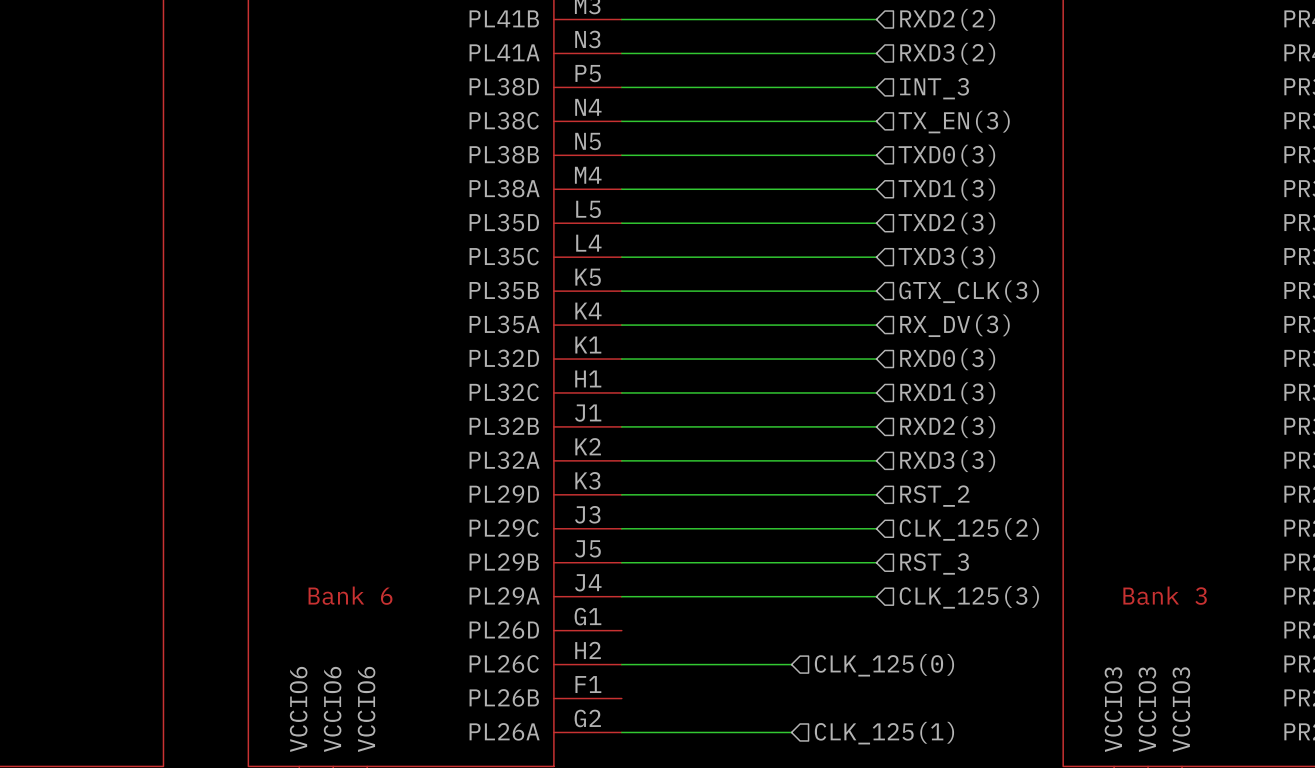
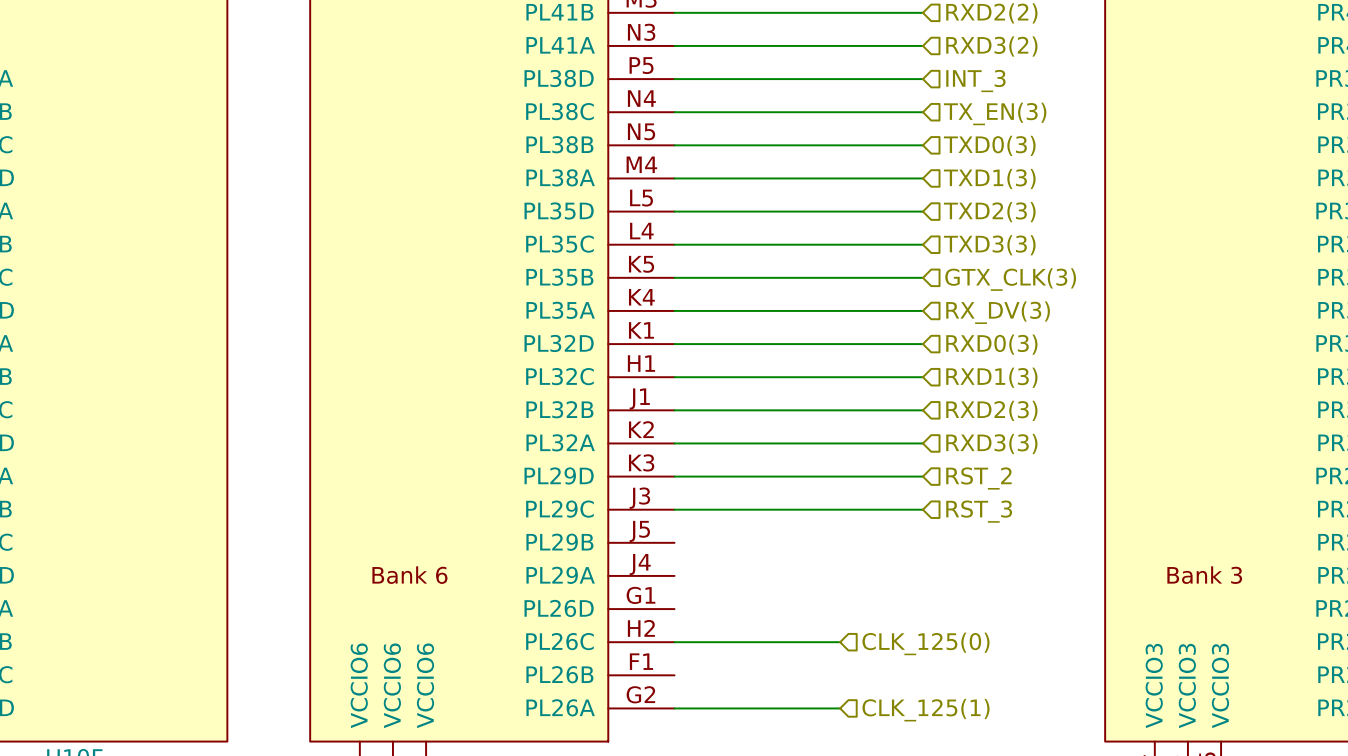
hierarchical label: CLK_125(2) (969, 529) -> RST_3 (979, 511)
wire: (621, 562) (876, 562) -> none
hierarchical label: RST_3 (934, 564) -> none
wire: (621, 596) (876, 596) -> none
hierarchical label: CLK_125(3) (969, 597) -> none

